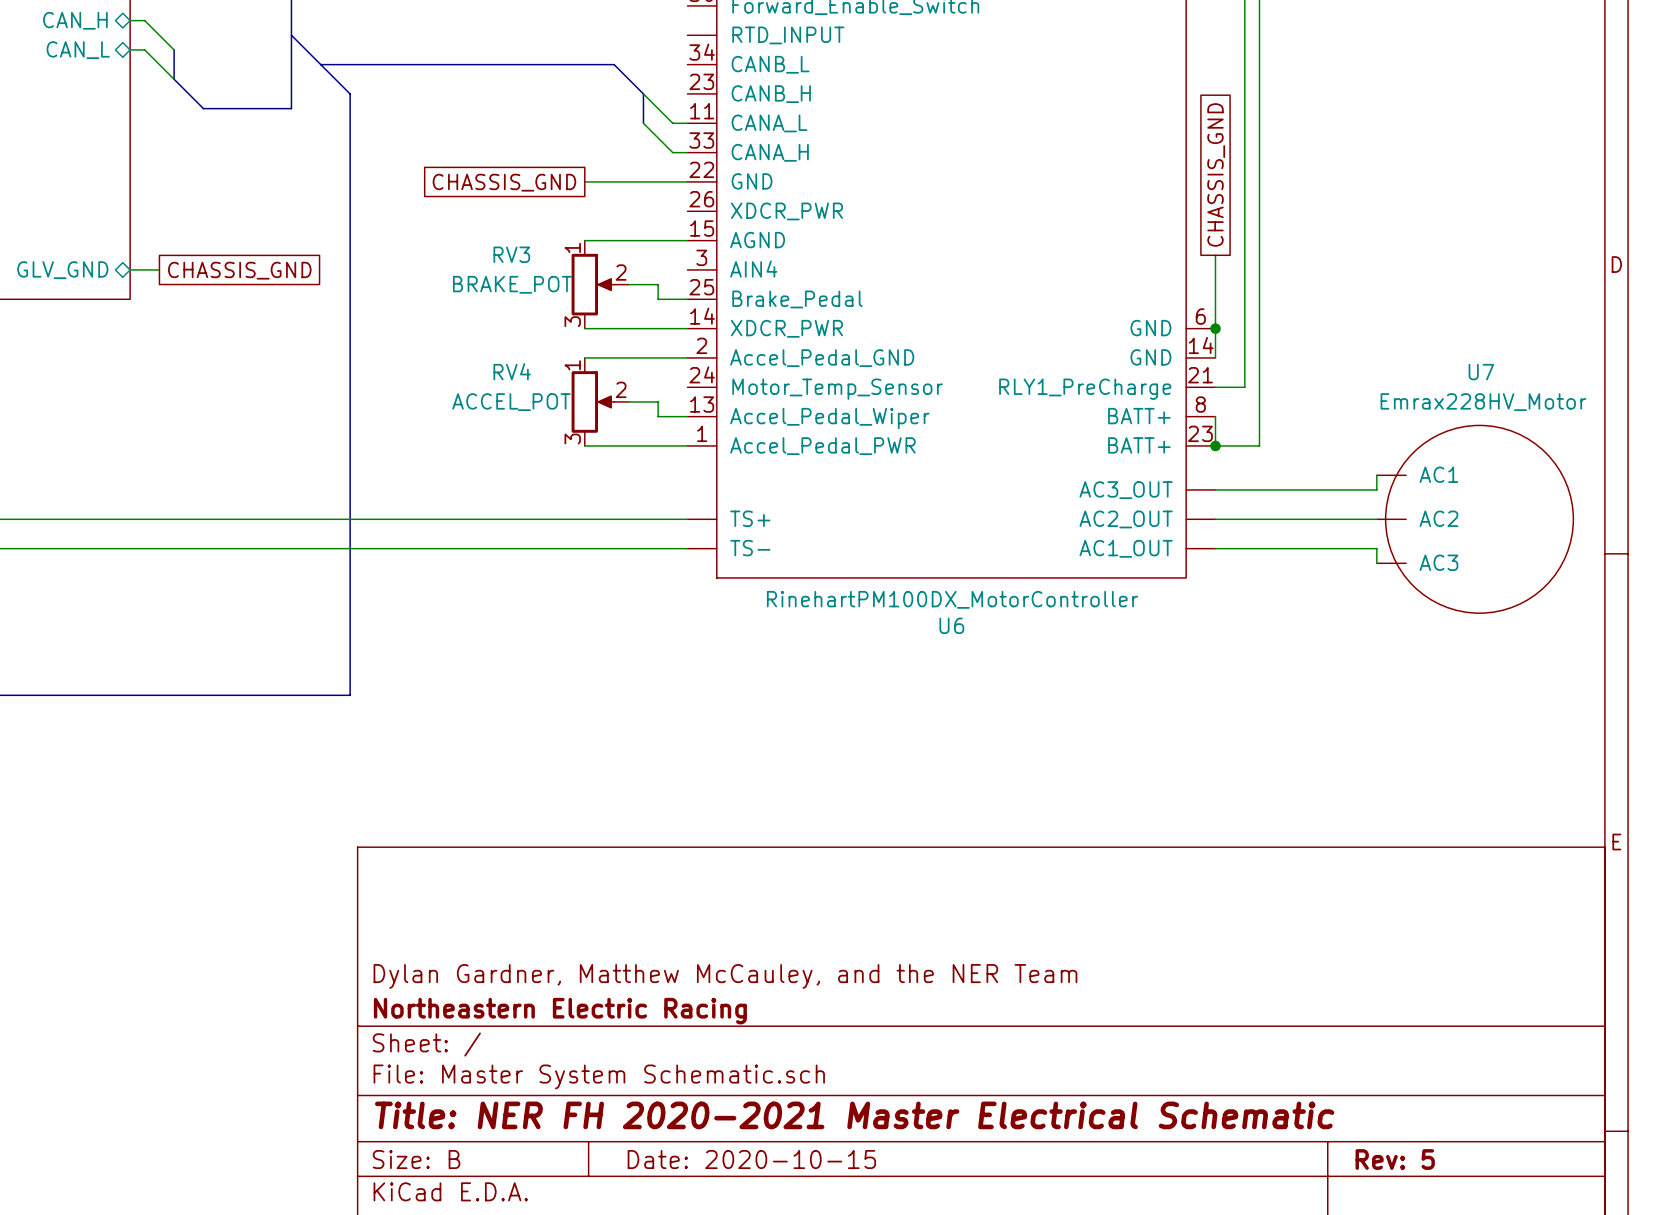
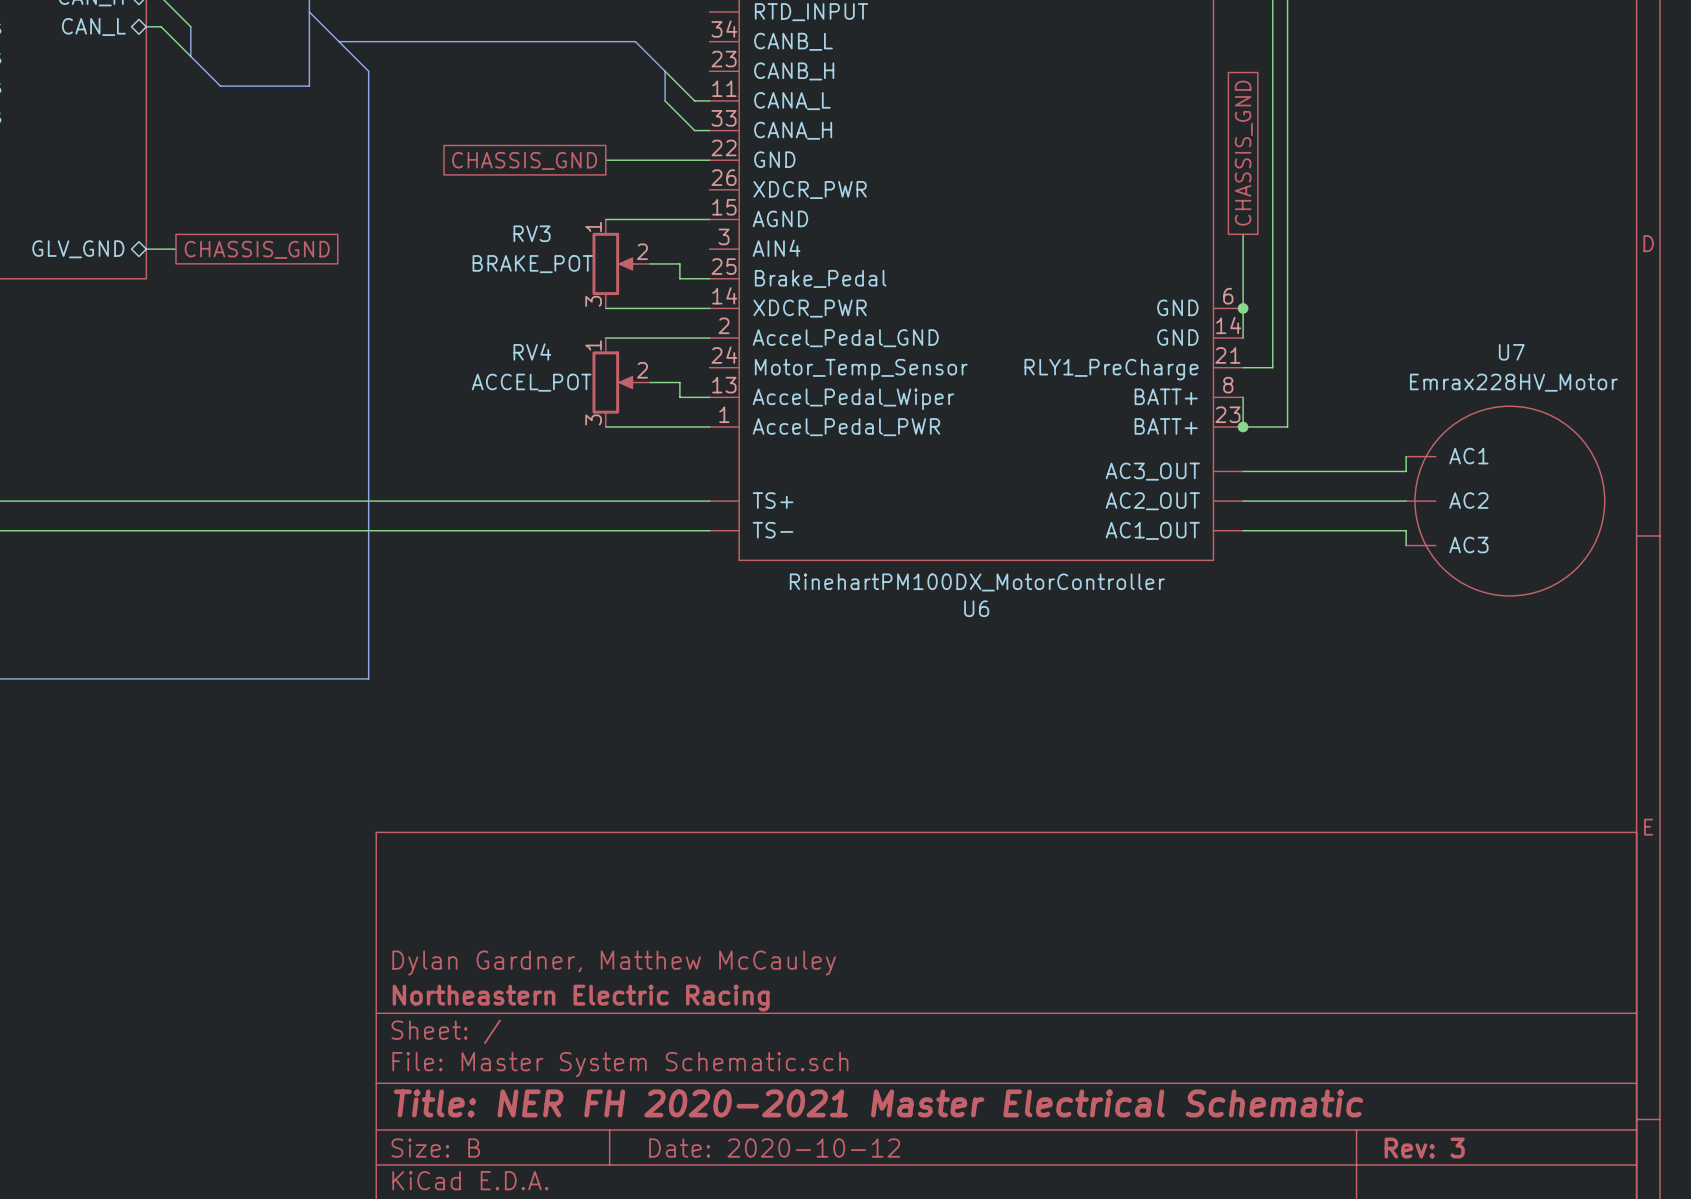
title block: Dylan Gardner, Matthew McCauley, and the NER Team (725, 976) -> Dylan Gardner, Matthew McCauley (614, 963)
title block: Date: 2020-10-15 (751, 1159) -> Date: 2020-10-12 (774, 1148)
title block: Rev: 5 (1395, 1159) -> Rev: 3 (1424, 1148)

